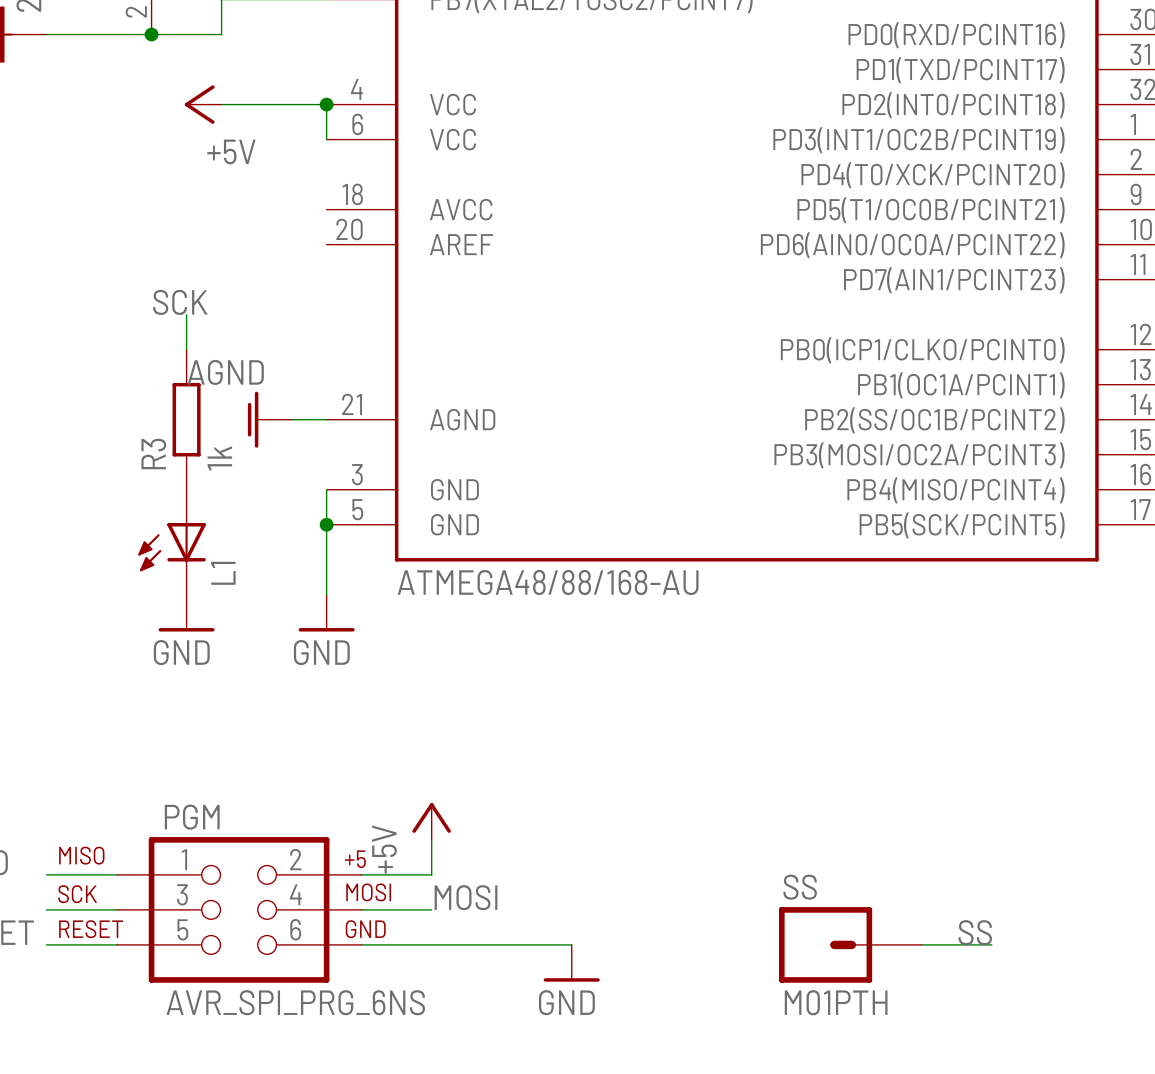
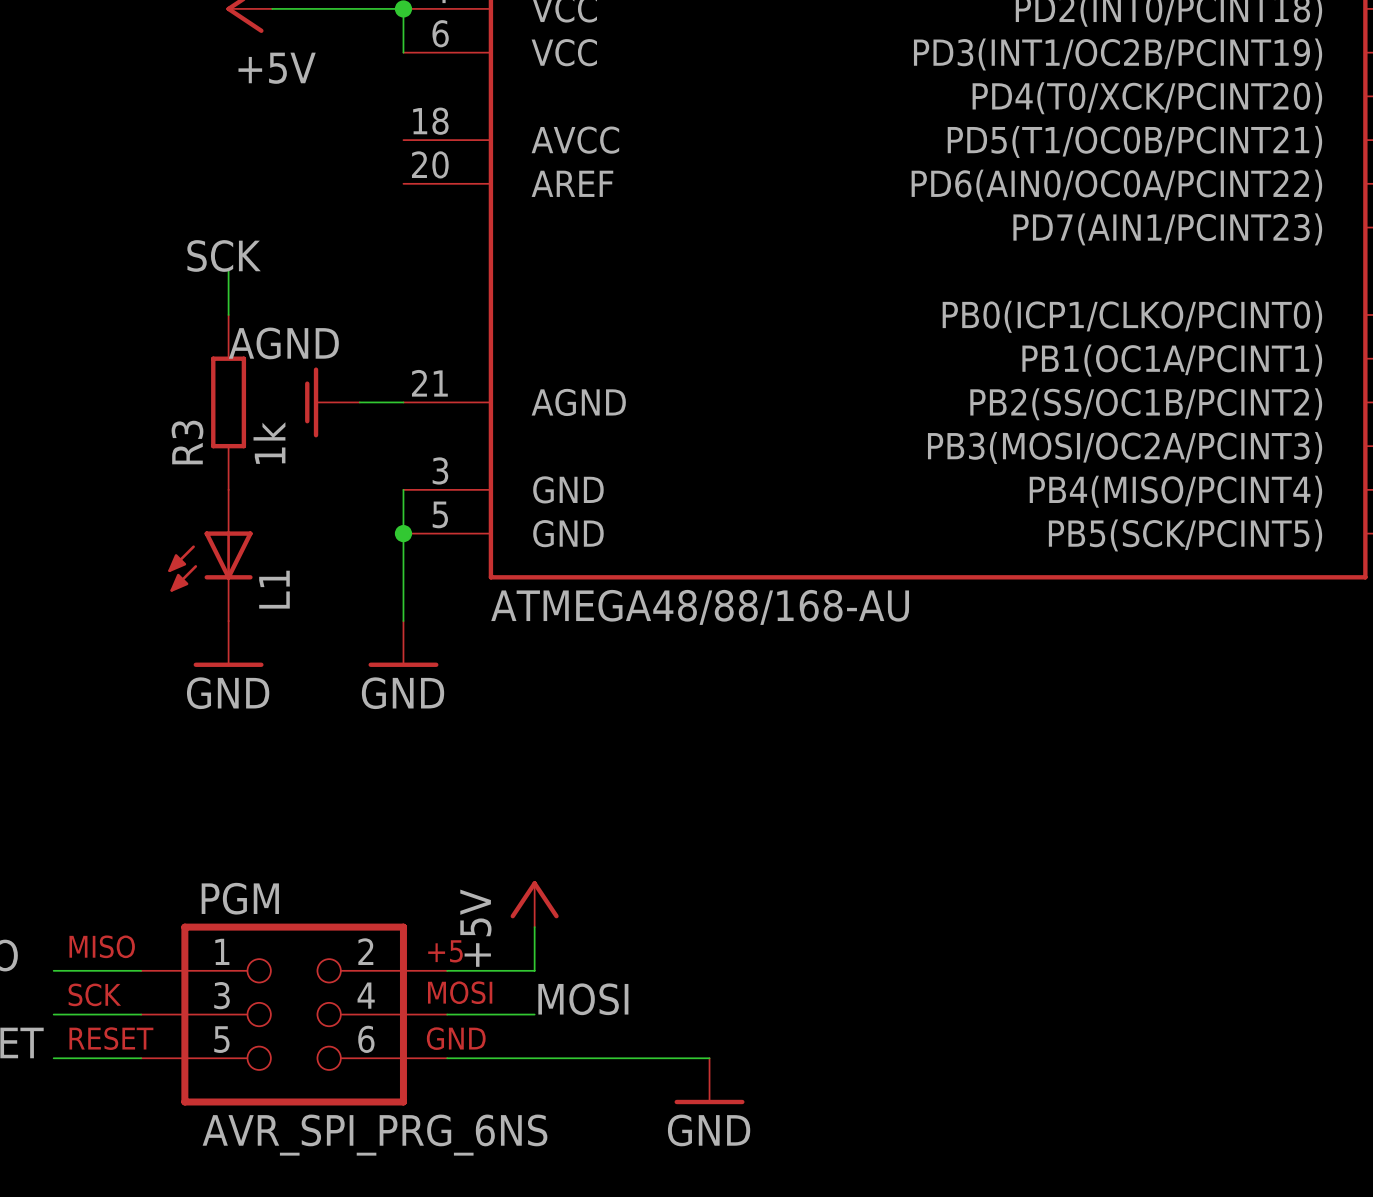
label: SS (975, 932) -> none
SS: M01PTH (850, 944) -> none
wire: (921, 944) (991, 944) -> none

